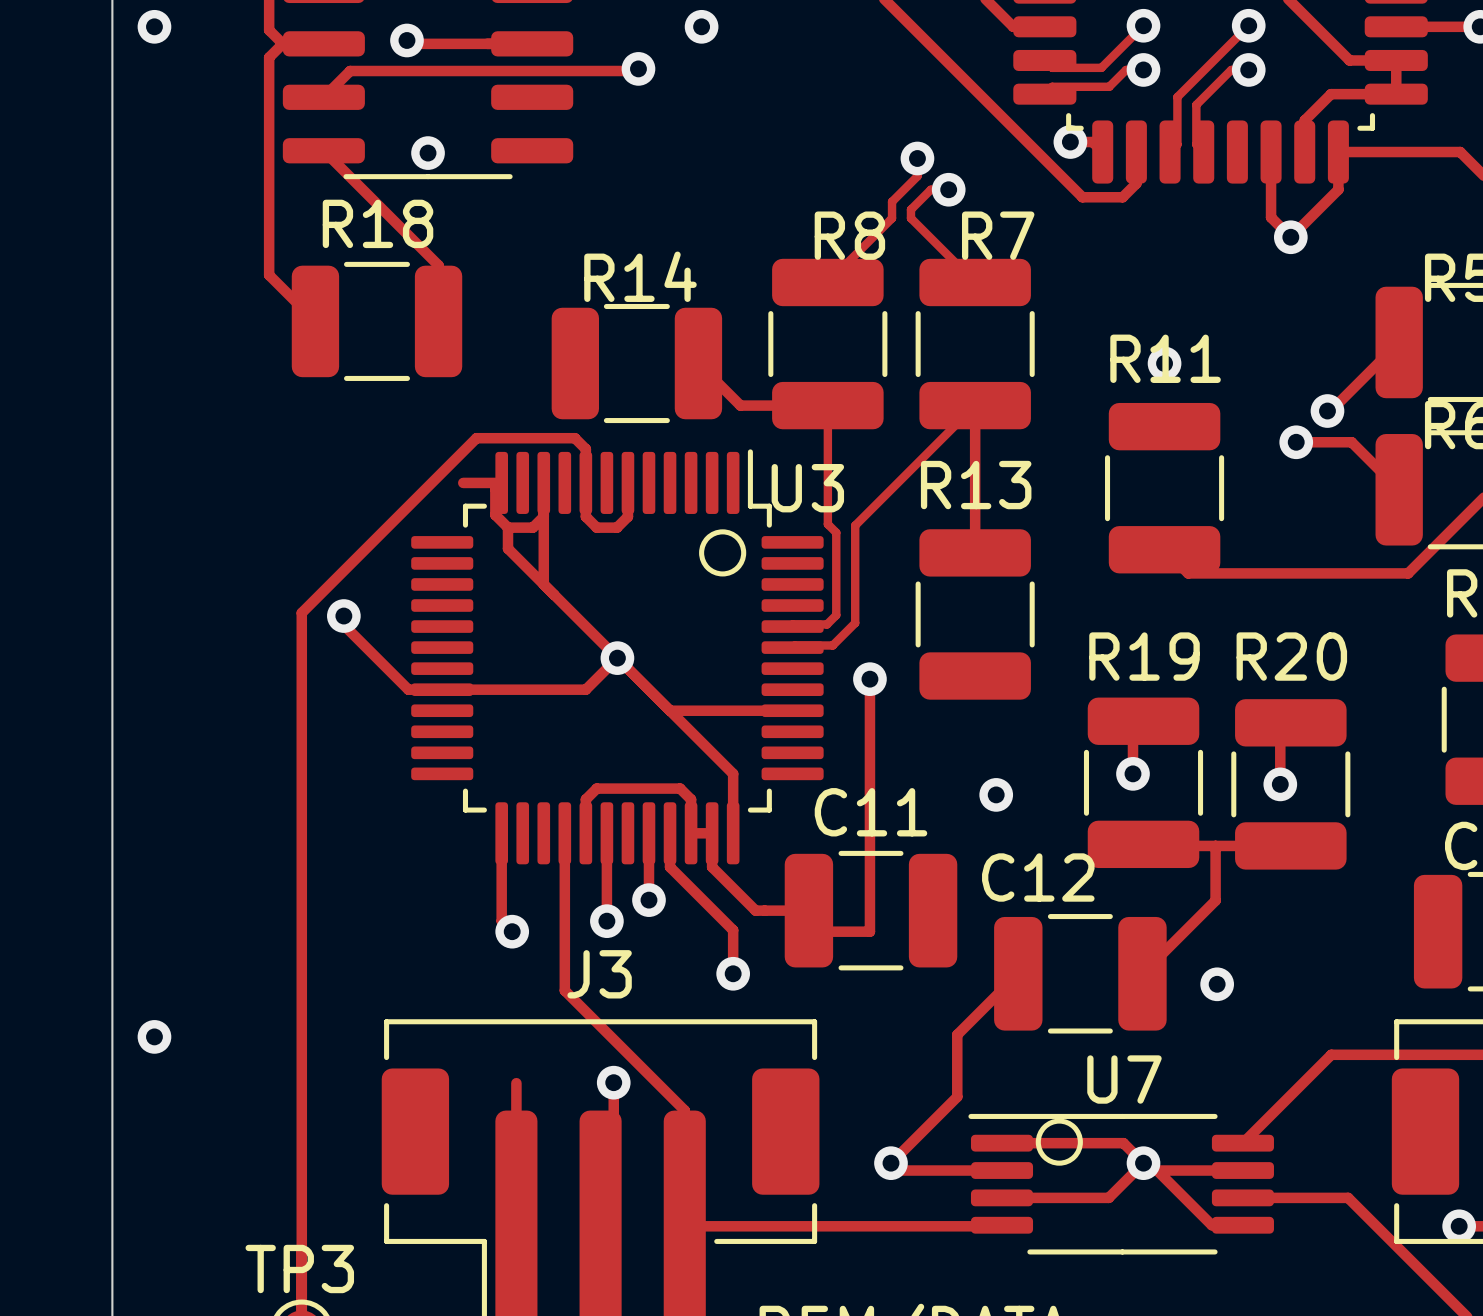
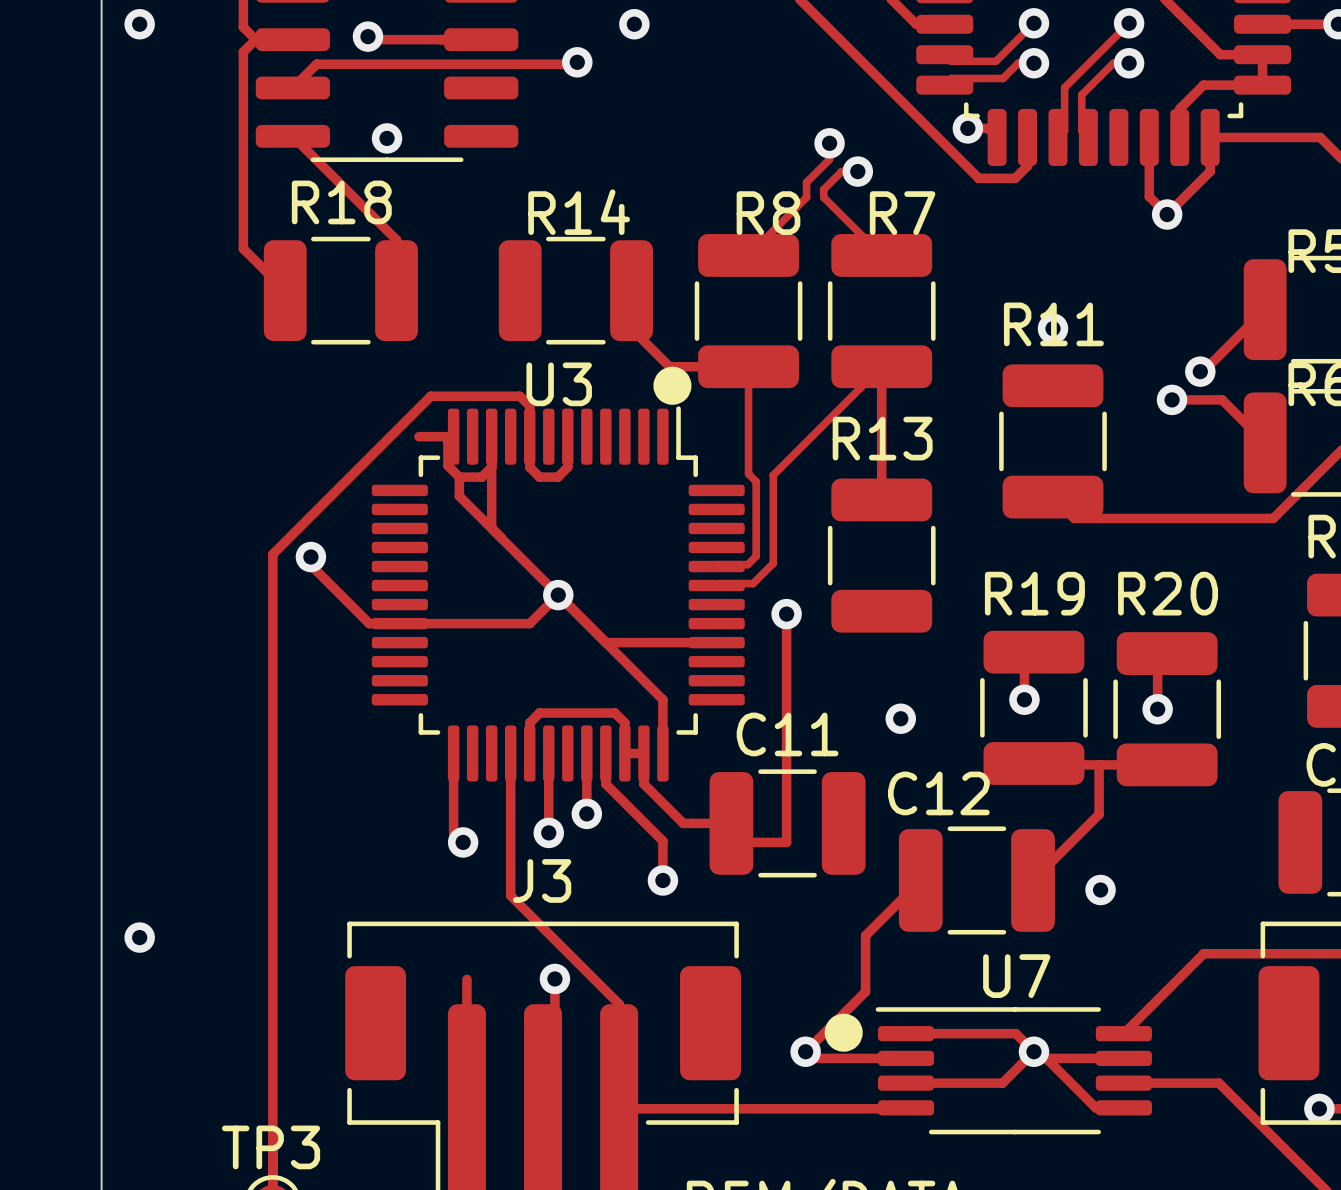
R14 position: (636, 363) -> (575, 290)
drawing: none -> [653, 366, 692, 405]
U3 name position: U3 (807, 488) -> U3 (559, 384)
drawing: [699, 529, 747, 577] -> none
drawing: [1035, 1118, 1083, 1166] -> none
drawing: none -> [824, 1013, 863, 1052]

